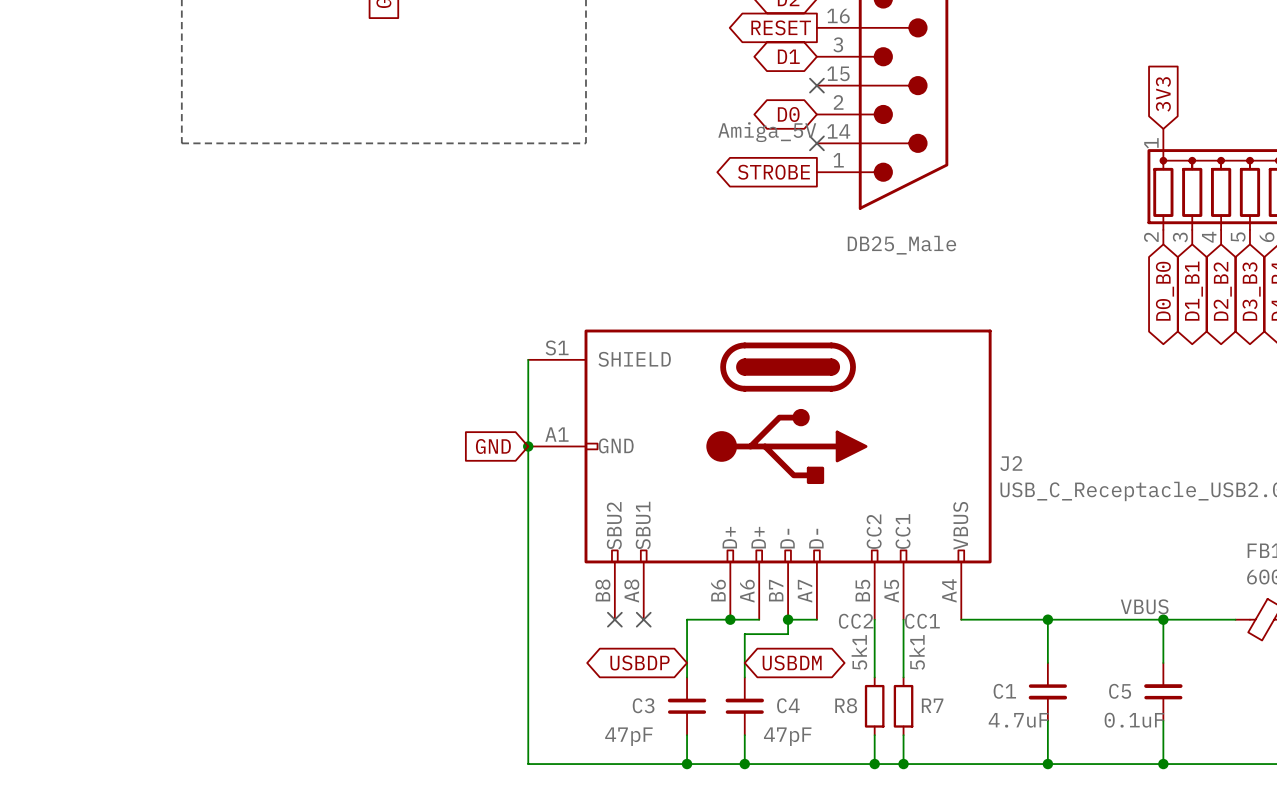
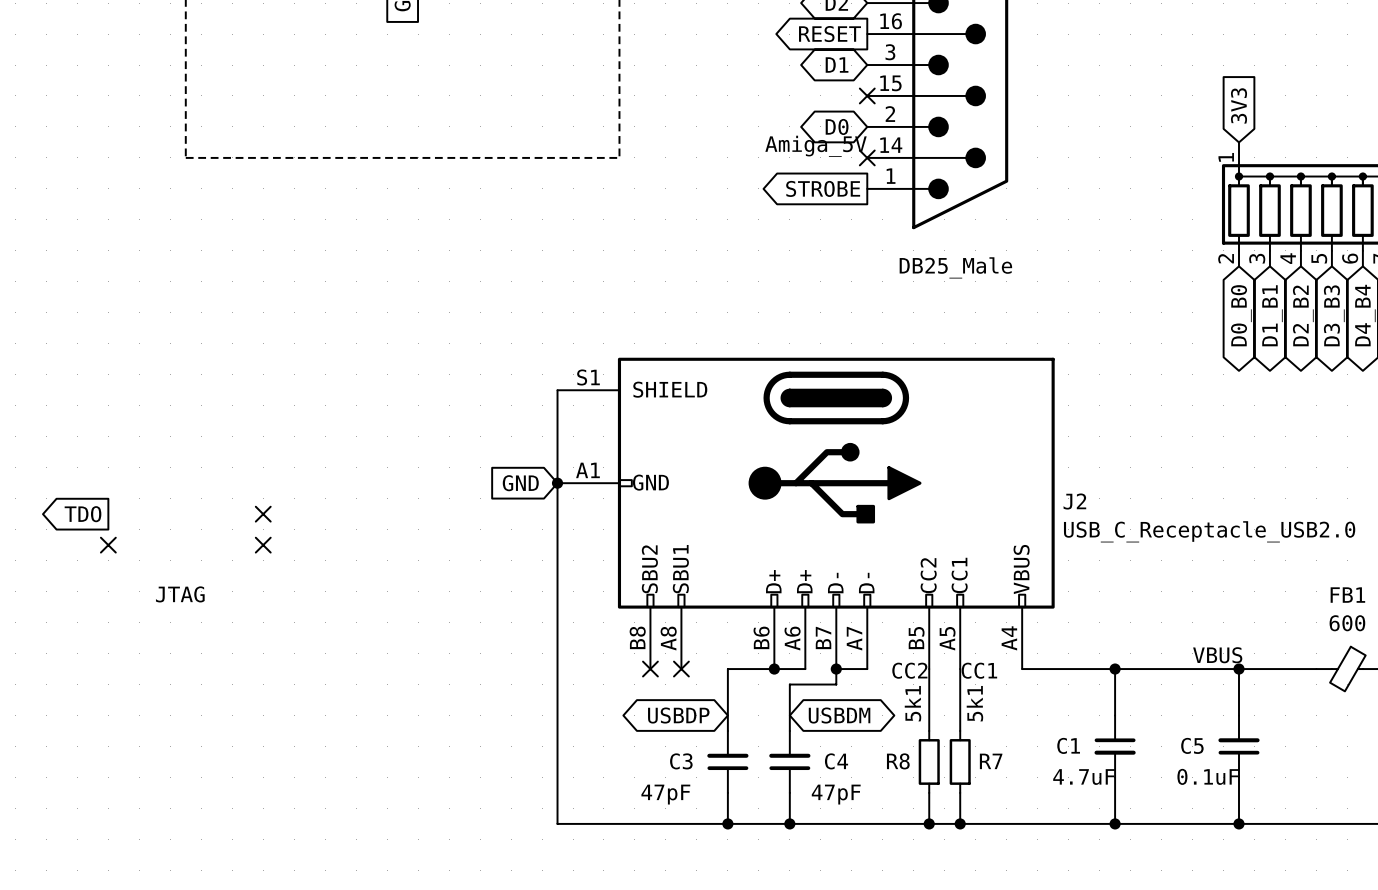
global label: none -> TDO (83, 514)
no-connect mark: none -> (263, 514)
no-connect mark: none -> (108, 545)
no-connect mark: none -> (263, 545)
text: none -> JTAG (180, 594)

